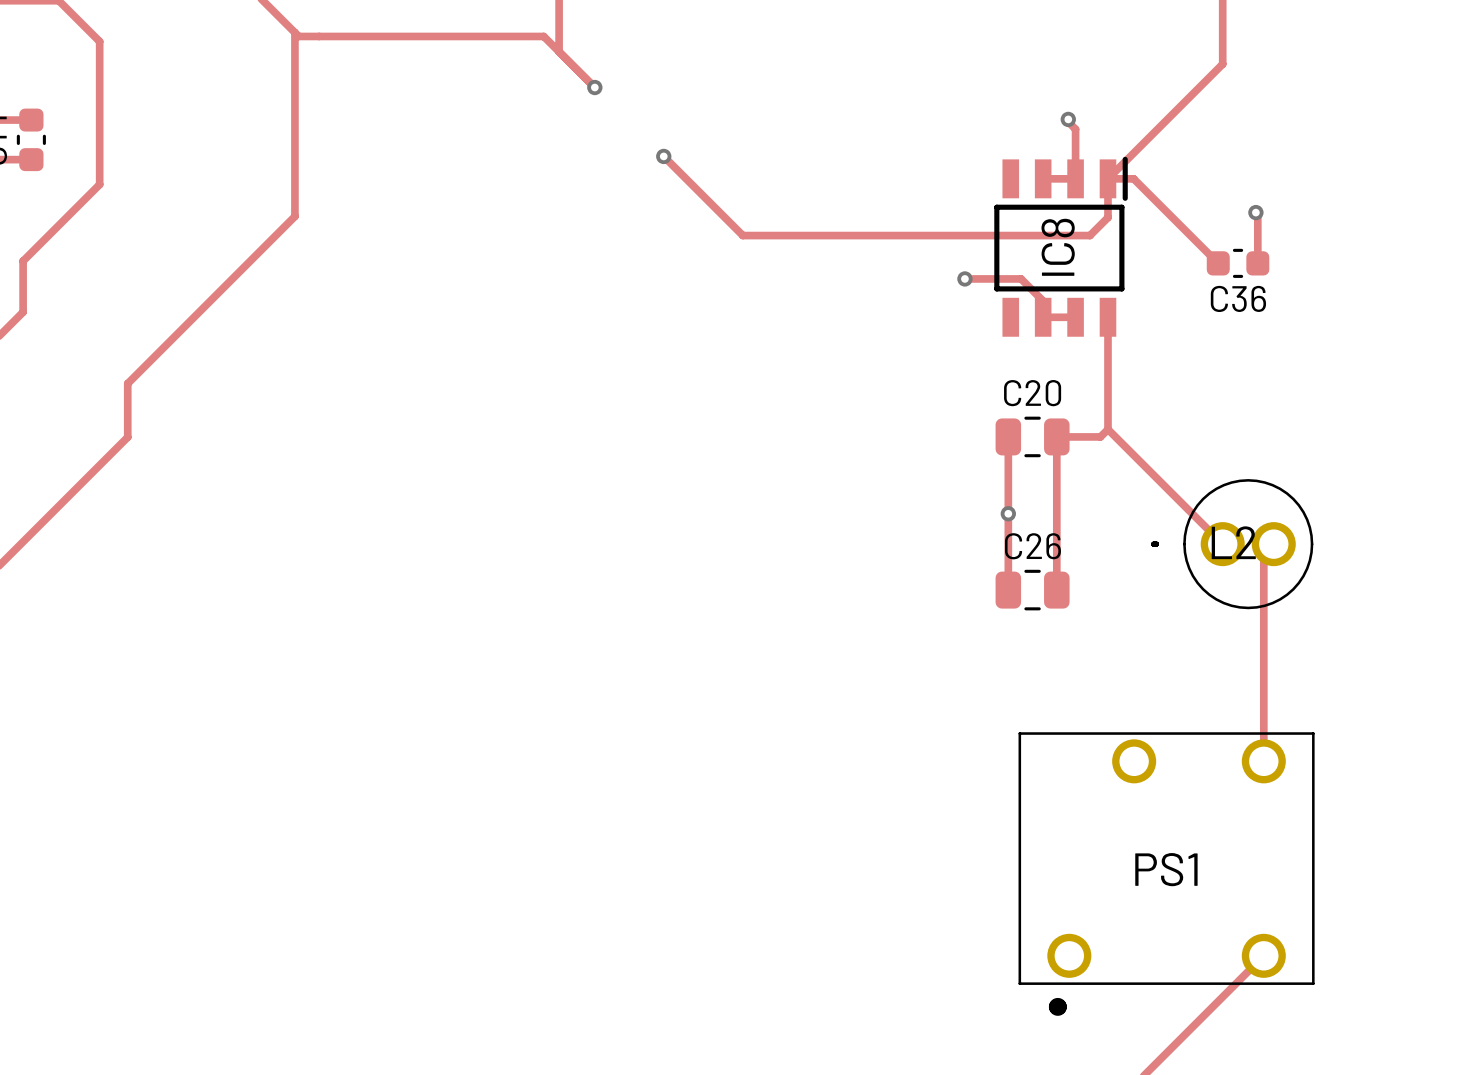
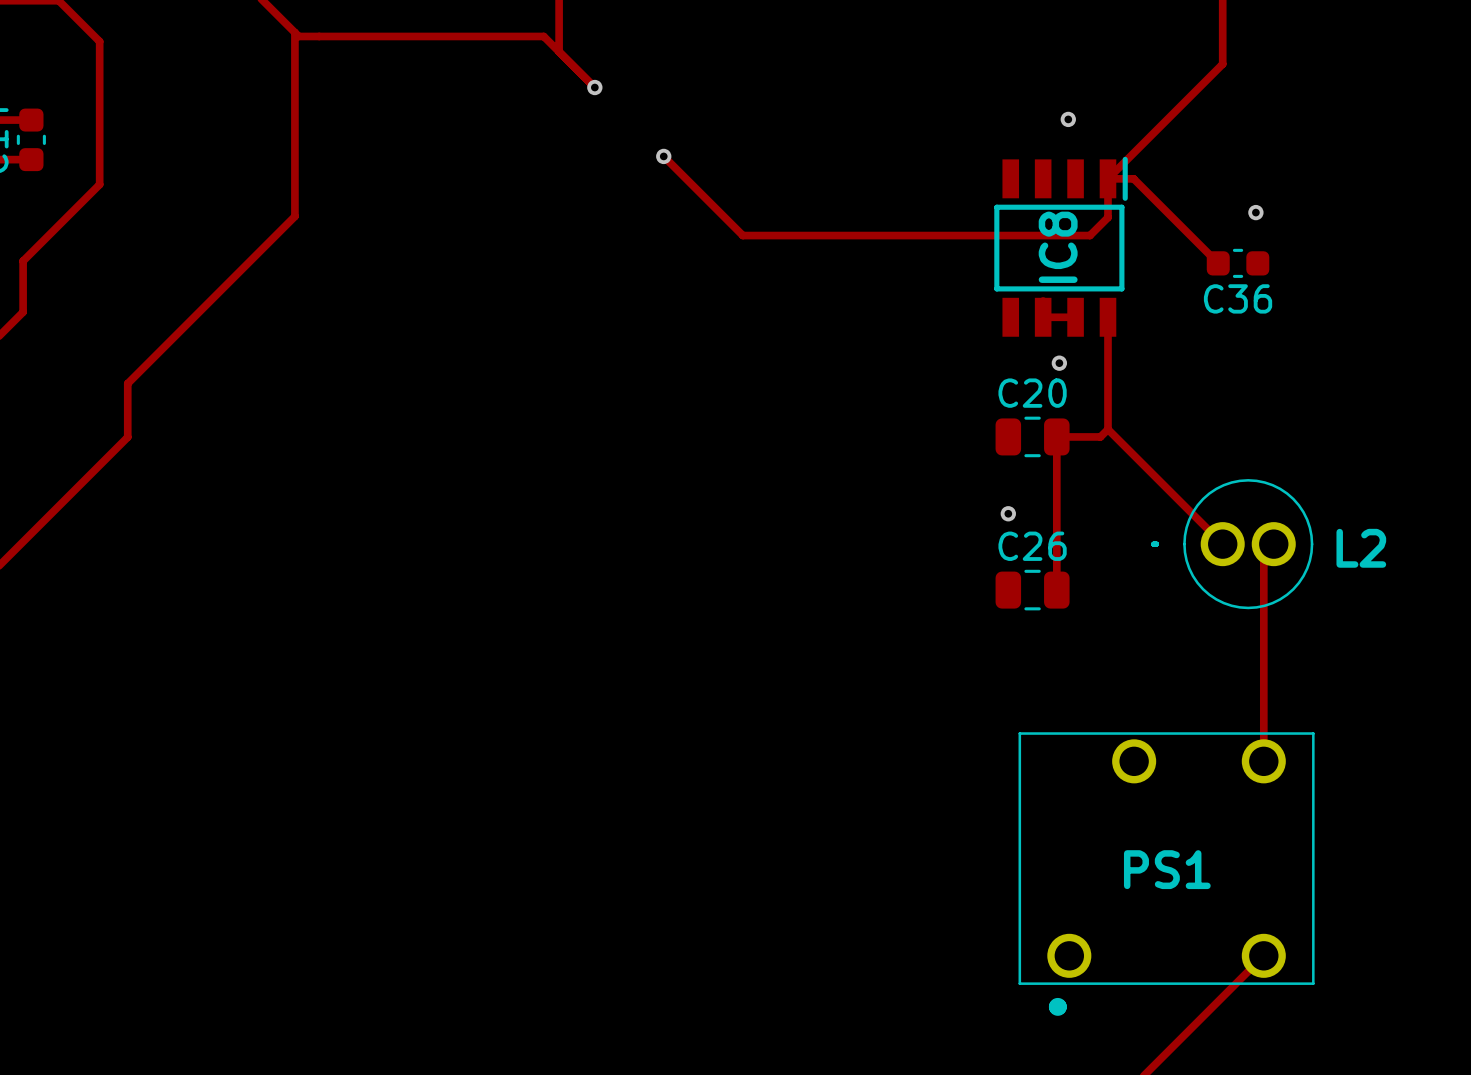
track: (1068, 119) (1067, 120) (1075, 129) (1075, 178) (1043, 178) -> none
track: (1257, 214) (1257, 263) -> none
track: (964, 278) (1021, 278) (1043, 301) -> none
via position: (964, 278) -> (1059, 363)
track: (1008, 436) (1008, 590) -> none
L2 name position: L2 (1233, 542) -> L2 (1361, 548)

